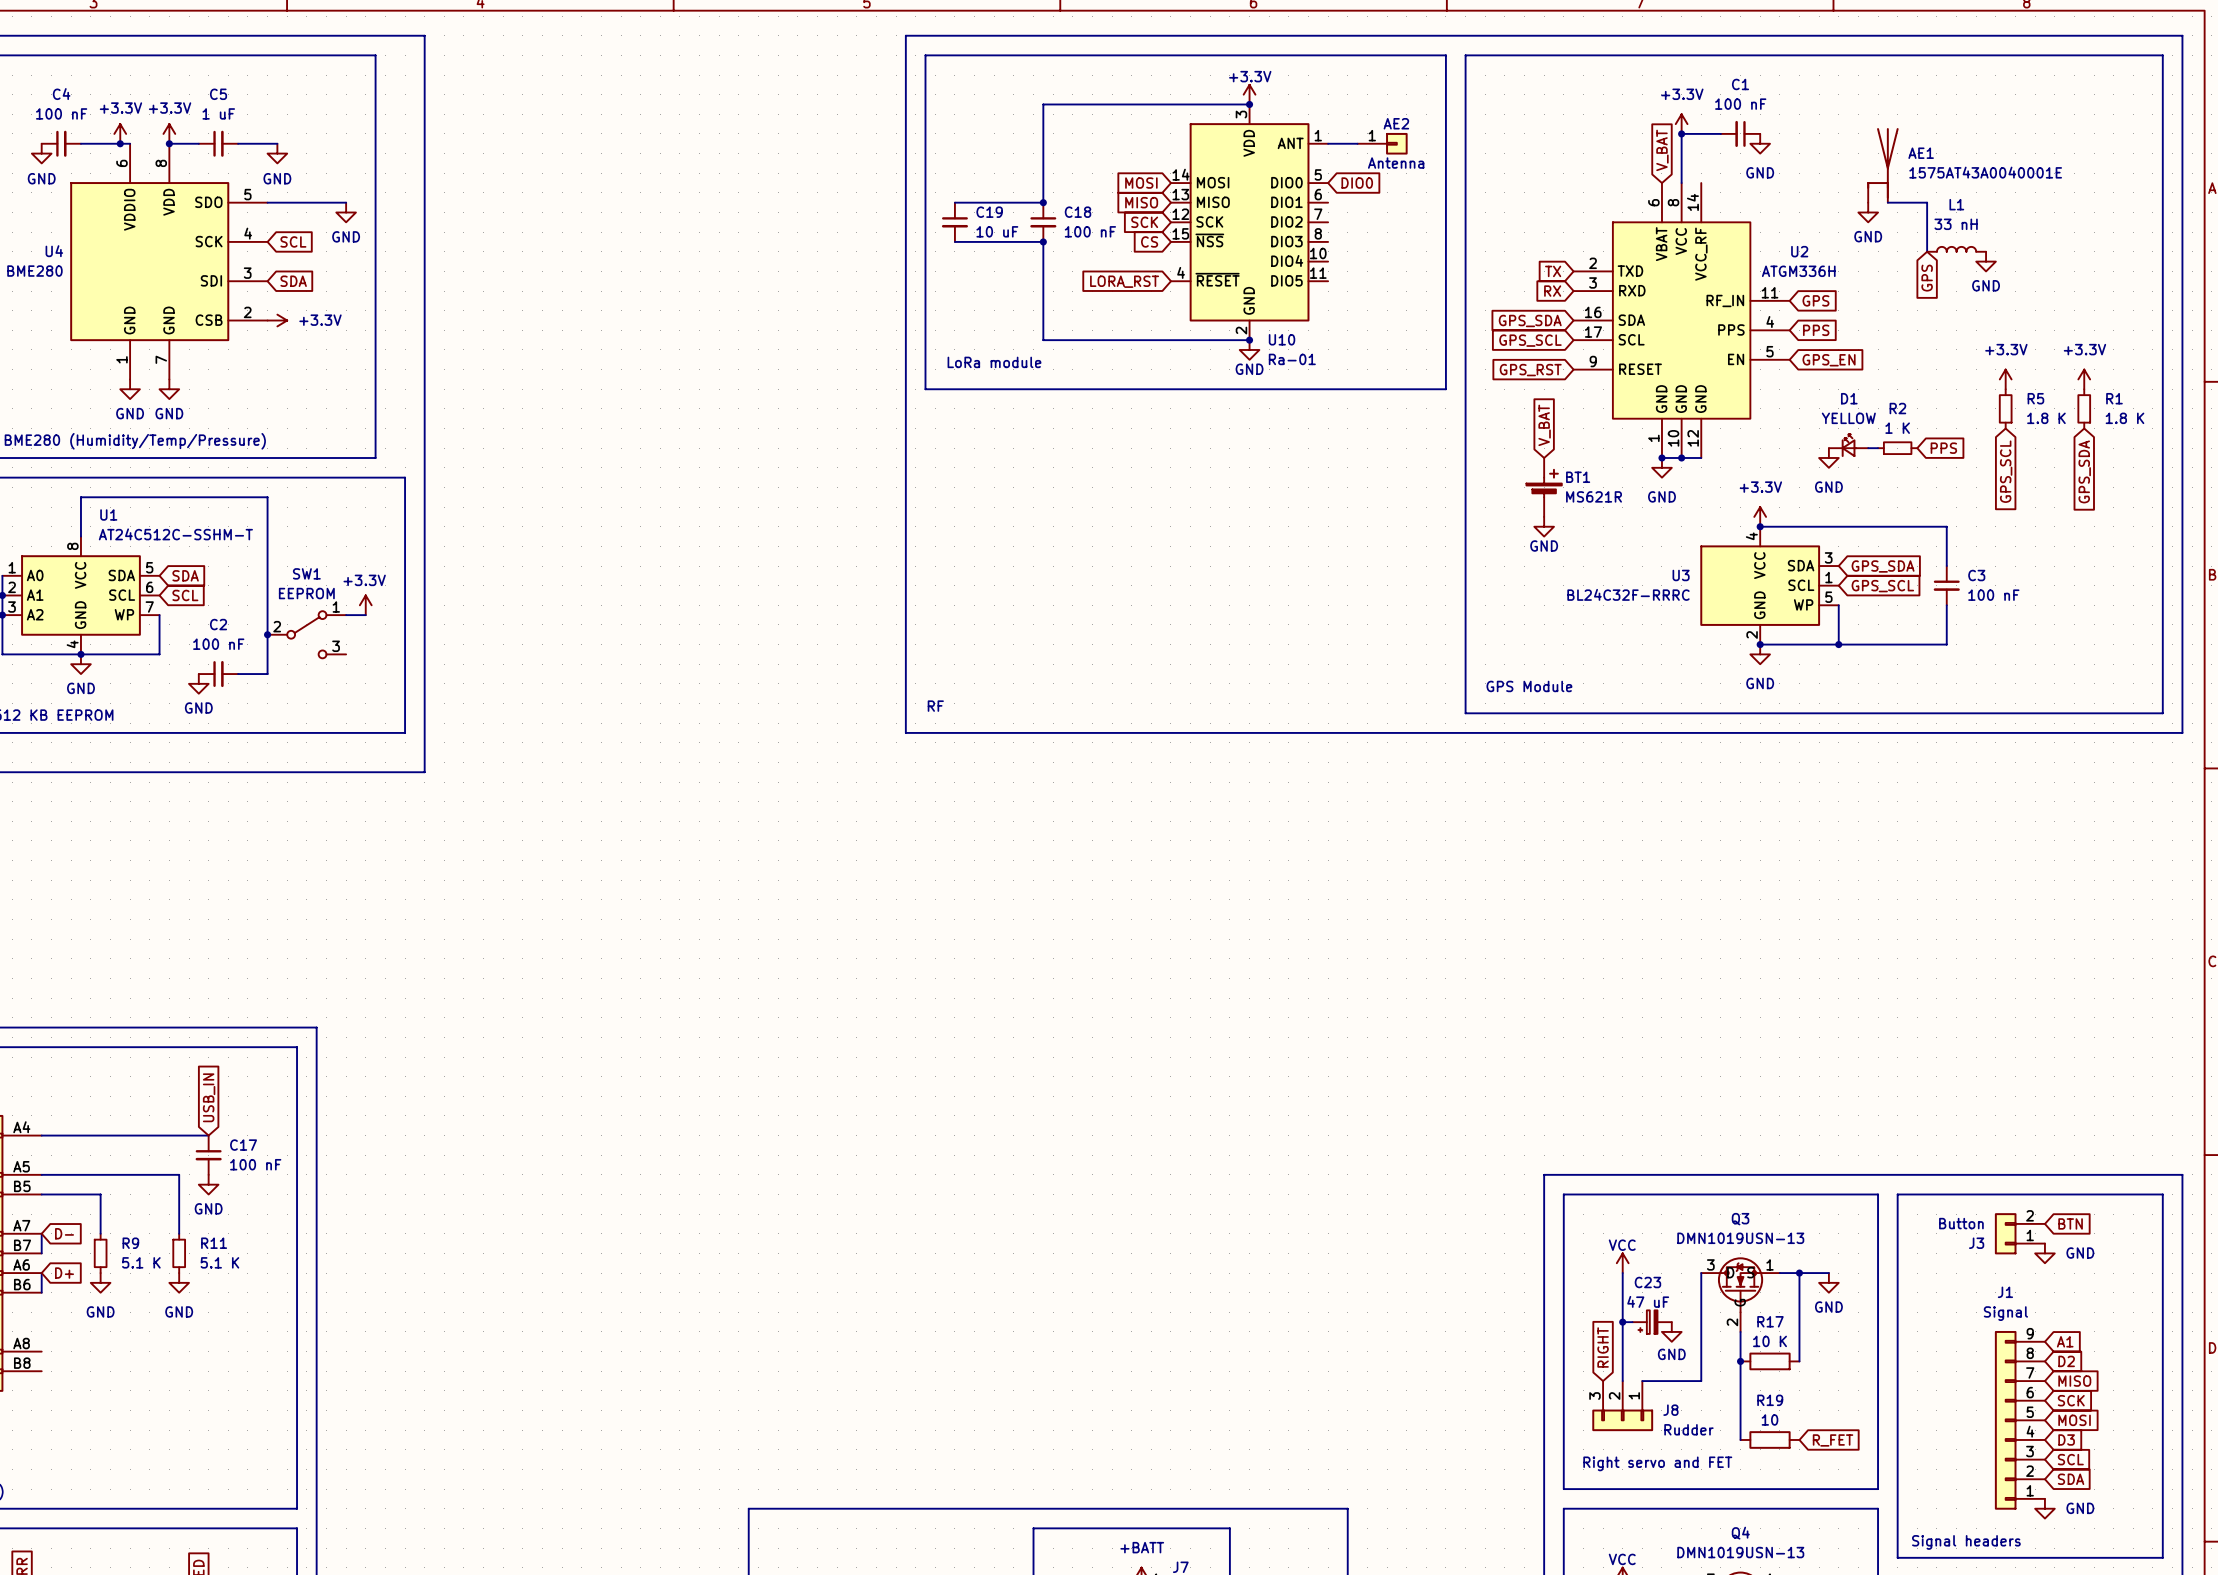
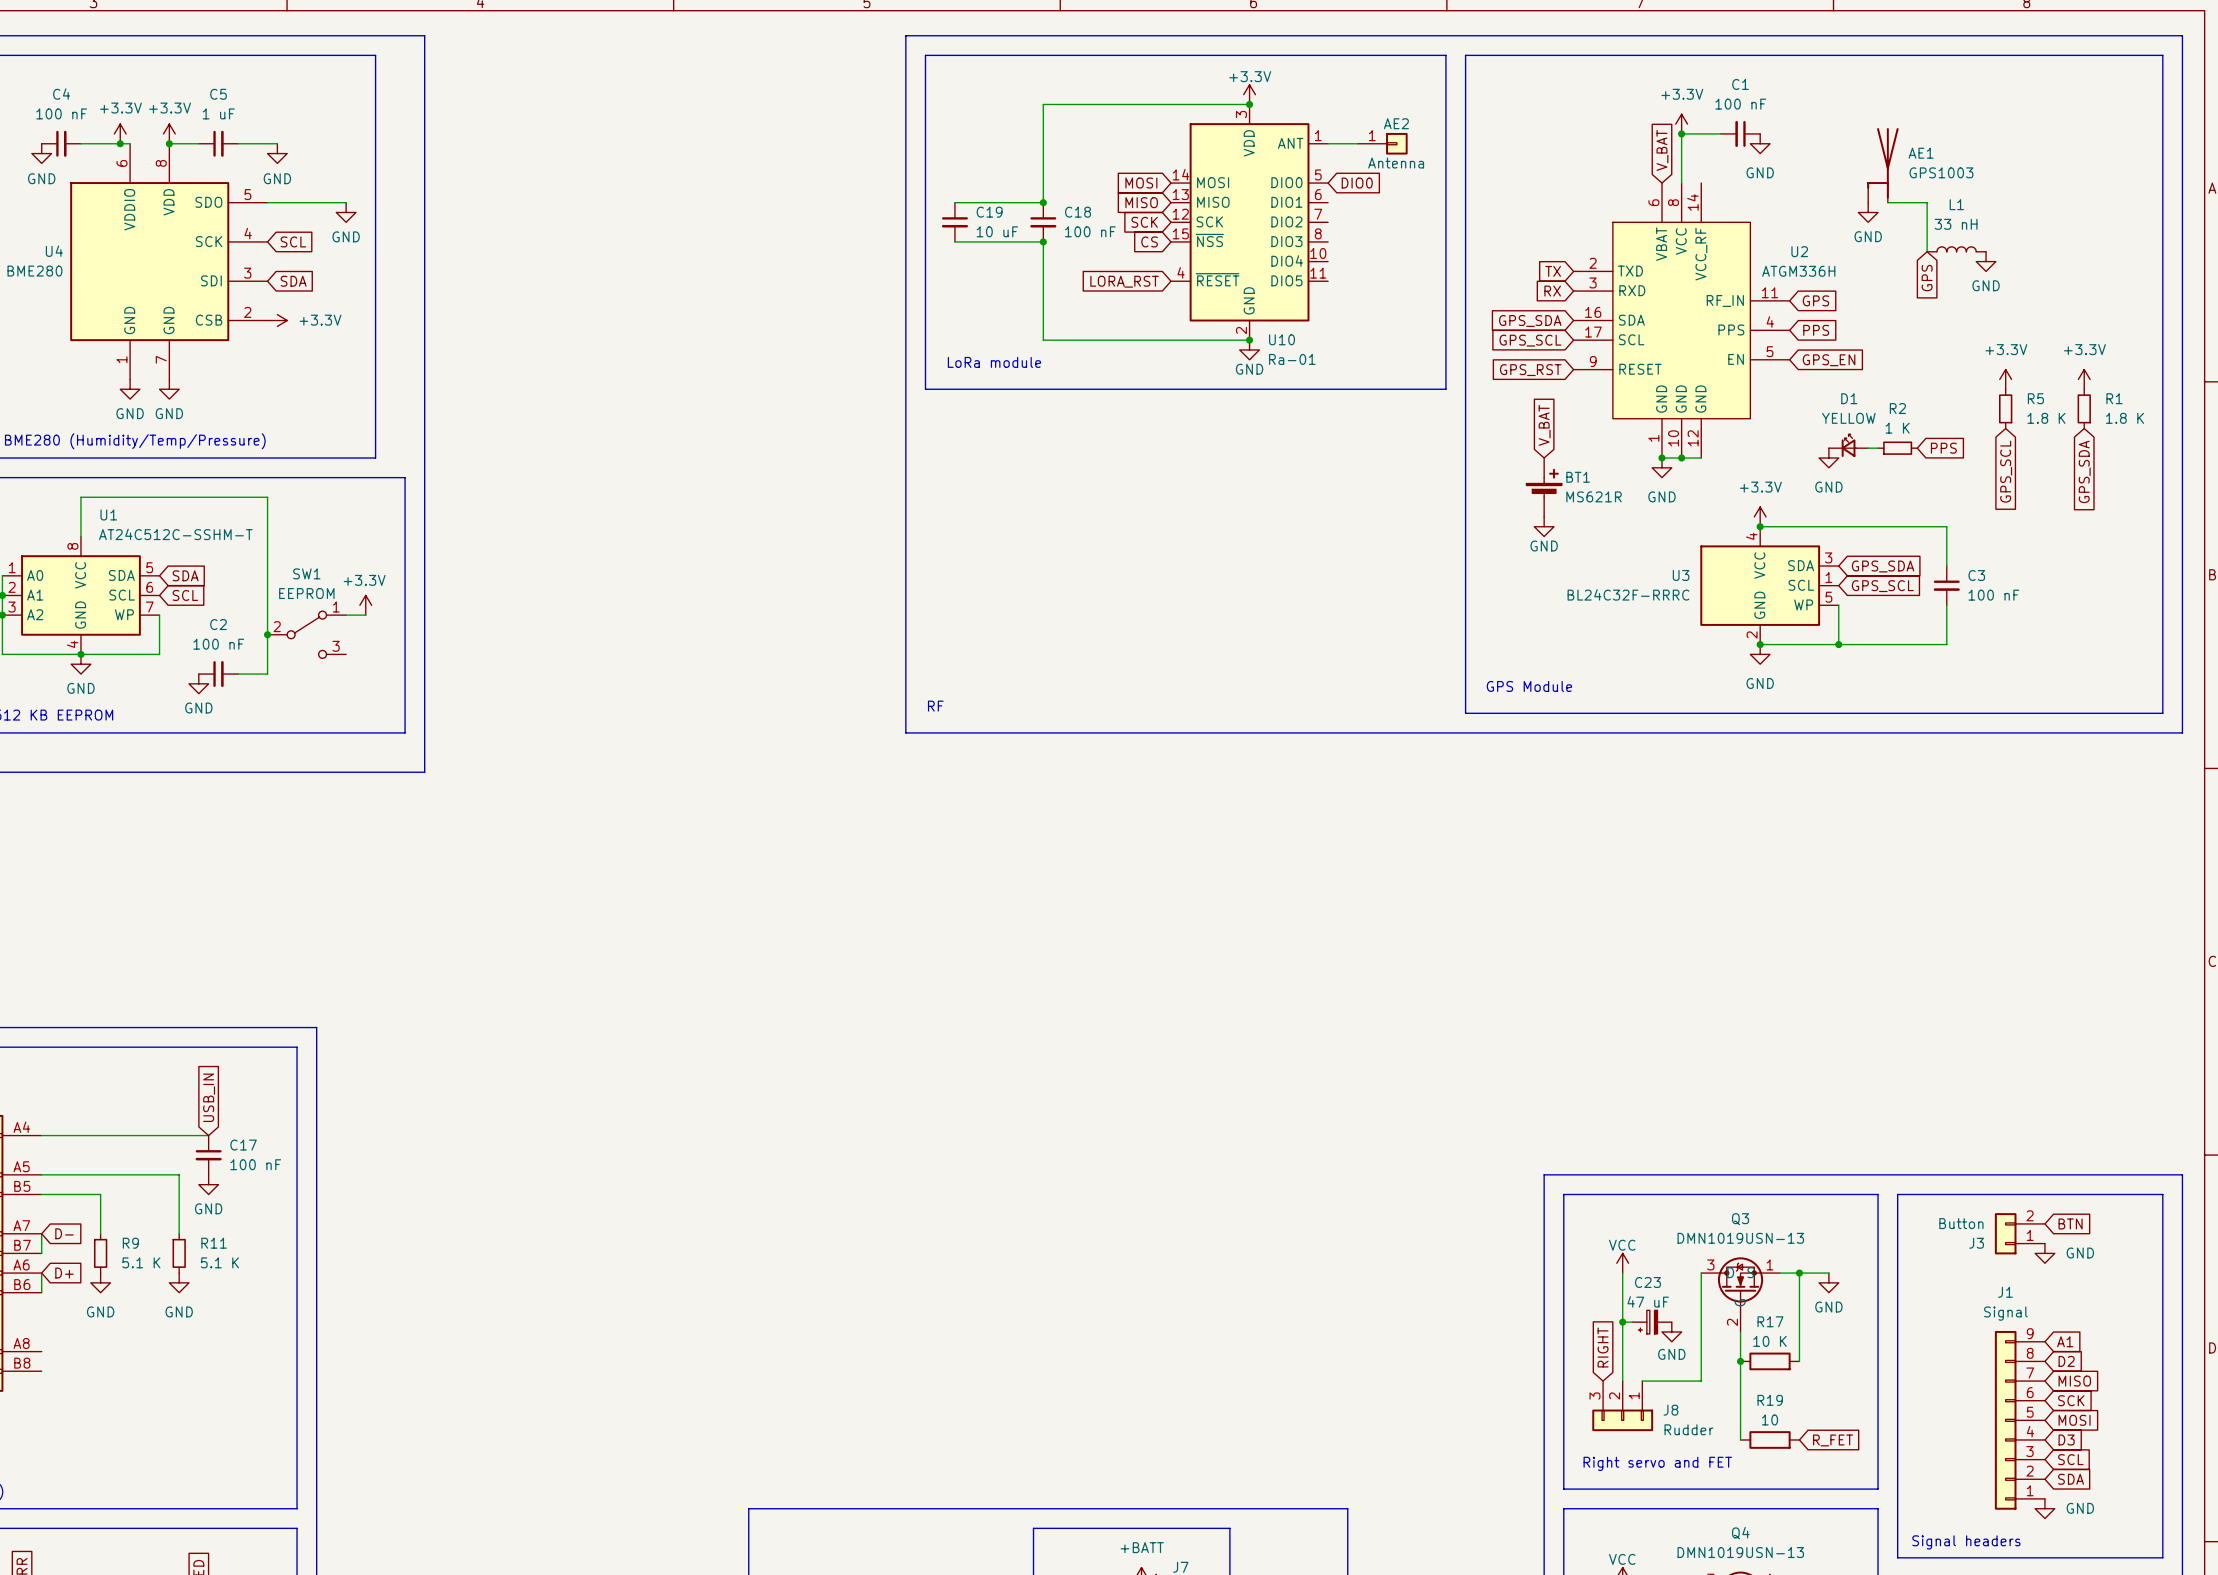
AE1 value: 1575AT43A0040001E (1985, 172) -> GPS1003 (1941, 172)

